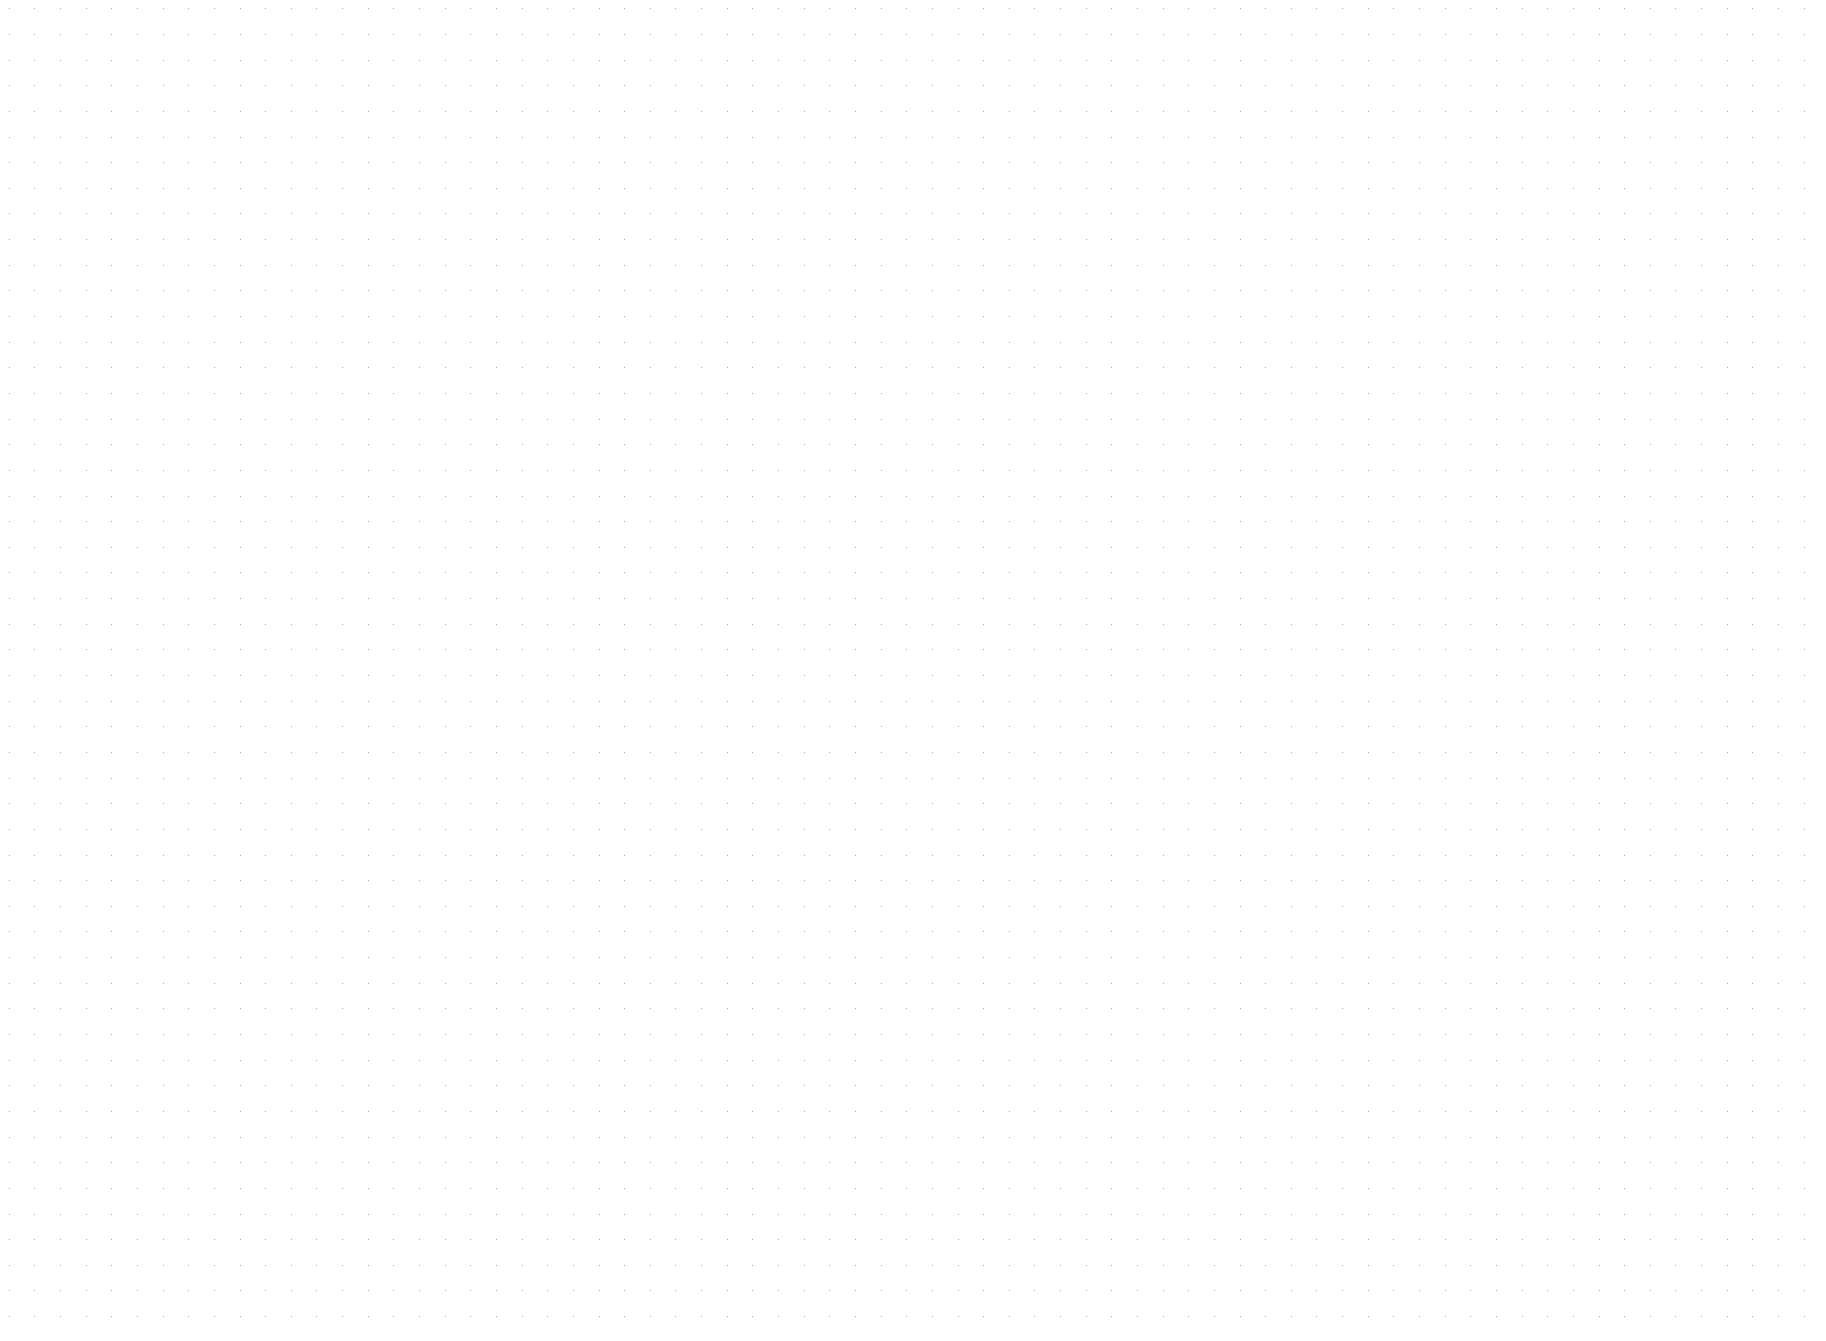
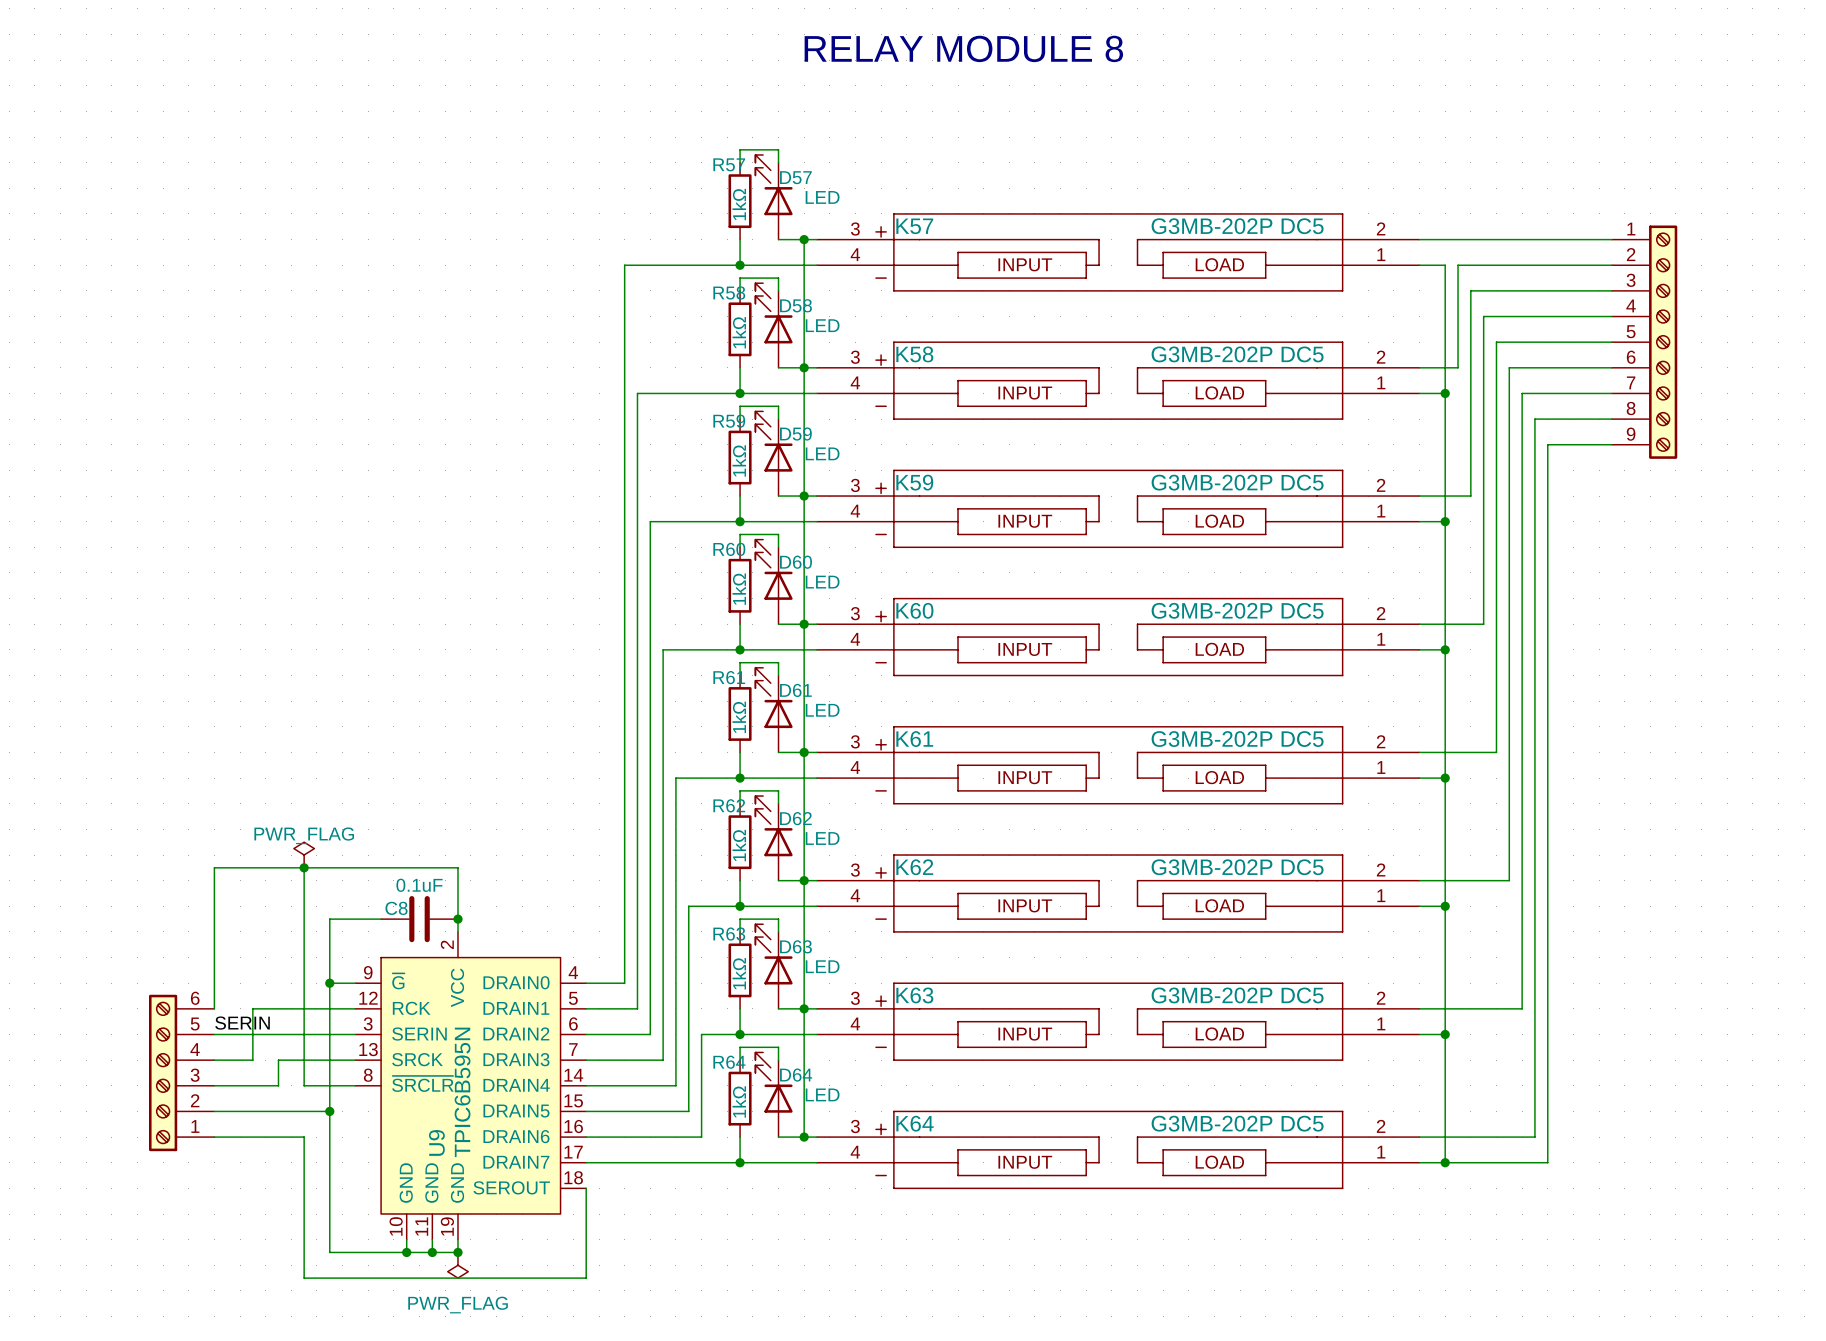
text: none -> RELAY MODULE 8 (963, 48)
wire: none -> (740, 162) (740, 149) (778, 149) (778, 162)
D57: none -> LED (774, 197)
R57: none -> 1kΩ (740, 201)
wire: none -> (740, 239) (740, 265)
wire: none -> (778, 239) (816, 239)
wire: none -> (804, 239) (804, 1137)
junction: none -> (804, 239)
wire: none -> (1419, 239) (1611, 239)
K57: none -> G3MB-202P DC5 (1118, 252)
junction: none -> (740, 265)
wire: none -> (816, 265) (624, 265) (624, 983) (586, 983)
wire: none -> (1419, 265) (1445, 265) (1445, 1162)
wire: none -> (1611, 265) (1458, 265) (1458, 367) (1419, 367)
wire: none -> (740, 290) (740, 278) (778, 278) (778, 290)
wire: none -> (1611, 290) (1470, 290) (1470, 496) (1419, 496)
wire: none -> (1611, 316) (1483, 316) (1483, 624) (1419, 624)
D58: none -> LED (774, 325)
R58: none -> 1kΩ (740, 329)
wire: none -> (1611, 342) (1496, 342) (1496, 752) (1419, 752)
part: none -> (1644, 342)
wire: none -> (740, 367) (740, 393)
wire: none -> (778, 367) (816, 367)
junction: none -> (804, 367)
wire: none -> (1611, 367) (1509, 367) (1509, 880) (1419, 880)
K58: none -> G3MB-202P DC5 (1118, 380)
junction: none -> (740, 393)
wire: none -> (816, 393) (637, 393) (637, 1008) (586, 1008)
wire: none -> (1419, 393) (1445, 393)
junction: none -> (1445, 393)
wire: none -> (1611, 393) (1522, 393) (1522, 1008) (1419, 1008)
wire: none -> (740, 419) (740, 406) (778, 406) (778, 419)
wire: none -> (1611, 419) (1534, 419) (1534, 1137) (1419, 1137)
wire: none -> (1611, 444) (1547, 444) (1547, 1162) (1419, 1162)
D59: none -> LED (774, 453)
R59: none -> 1kΩ (740, 457)
wire: none -> (740, 496) (740, 521)
wire: none -> (778, 496) (816, 496)
junction: none -> (804, 496)
K59: none -> G3MB-202P DC5 (1118, 508)
junction: none -> (740, 521)
wire: none -> (816, 521) (650, 521) (650, 1034) (586, 1034)
wire: none -> (1419, 521) (1445, 521)
junction: none -> (1445, 521)
wire: none -> (740, 547) (740, 534) (778, 534) (778, 547)
D60: none -> LED (774, 581)
R60: none -> 1kΩ (740, 585)
wire: none -> (740, 624) (740, 649)
wire: none -> (778, 624) (816, 624)
junction: none -> (804, 624)
K60: none -> G3MB-202P DC5 (1118, 637)
junction: none -> (740, 649)
wire: none -> (816, 649) (663, 649) (663, 1060) (586, 1060)
wire: none -> (1419, 649) (1445, 649)
junction: none -> (1445, 649)
wire: none -> (740, 675) (740, 662) (778, 662) (778, 675)
D61: none -> LED (774, 710)
R61: none -> 1kΩ (740, 713)
wire: none -> (740, 752) (740, 778)
wire: none -> (778, 752) (816, 752)
junction: none -> (804, 752)
K61: none -> G3MB-202P DC5 (1118, 765)
junction: none -> (740, 778)
wire: none -> (816, 778) (675, 778) (675, 1085) (586, 1085)
wire: none -> (1419, 778) (1445, 778)
junction: none -> (1445, 778)
wire: none -> (740, 803) (740, 790) (778, 790) (778, 803)
D62: none -> LED (774, 838)
R62: none -> 1kΩ (740, 842)
power symbol: none -> PWR_FLAG (304, 855)
wire: none -> (304, 867) (304, 1085) (355, 1085)
junction: none -> (304, 867)
wire: none -> (740, 880) (740, 906)
wire: none -> (778, 880) (816, 880)
junction: none -> (804, 880)
K62: none -> G3MB-202P DC5 (1118, 893)
junction: none -> (740, 906)
wire: none -> (816, 906) (688, 906) (688, 1111) (586, 1111)
wire: none -> (1419, 906) (1445, 906)
junction: none -> (1445, 906)
wire: none -> (381, 919) (329, 919) (329, 1252) (457, 1252) (457, 1239)
C8: none -> 0.1uF (419, 919)
junction: none -> (457, 919)
wire: none -> (457, 931) (457, 867) (214, 867) (214, 1008)
wire: none -> (740, 931) (740, 919) (778, 919) (778, 931)
D63: none -> LED (774, 966)
R63: none -> 1kΩ (740, 970)
wire: none -> (329, 983) (355, 983)
junction: none -> (329, 983)
wire: none -> (355, 1008) (252, 1008) (252, 1060) (214, 1060)
wire: none -> (740, 1008) (740, 1034)
wire: none -> (778, 1008) (816, 1008)
junction: none -> (804, 1008)
K63: none -> G3MB-202P DC5 (1118, 1021)
label: none -> SERIN (242, 1023)
wire: none -> (214, 1034) (355, 1034)
junction: none -> (740, 1034)
wire: none -> (816, 1034) (701, 1034) (701, 1137) (586, 1137)
wire: none -> (1419, 1034) (1445, 1034)
junction: none -> (1445, 1034)
wire: none -> (355, 1060) (278, 1060) (278, 1085) (214, 1085)
wire: none -> (740, 1060) (740, 1047) (778, 1047) (778, 1060)
part: none -> (181, 1072)
U9: none -> TPIC6B595N (470, 1085)
D64: none -> LED (774, 1094)
R64: none -> 1kΩ (740, 1098)
wire: none -> (214, 1111) (329, 1111)
junction: none -> (329, 1111)
wire: none -> (214, 1137) (304, 1137) (304, 1278) (586, 1278) (586, 1188)
wire: none -> (740, 1137) (740, 1162)
wire: none -> (778, 1137) (816, 1137)
junction: none -> (804, 1137)
K64: none -> G3MB-202P DC5 (1118, 1149)
wire: none -> (586, 1162) (816, 1162)
junction: none -> (740, 1162)
junction: none -> (1445, 1162)
wire: none -> (406, 1239) (406, 1252)
wire: none -> (432, 1239) (432, 1252)
junction: none -> (406, 1252)
junction: none -> (432, 1252)
junction: none -> (457, 1252)
power symbol: none -> PWR_FLAG (457, 1265)

